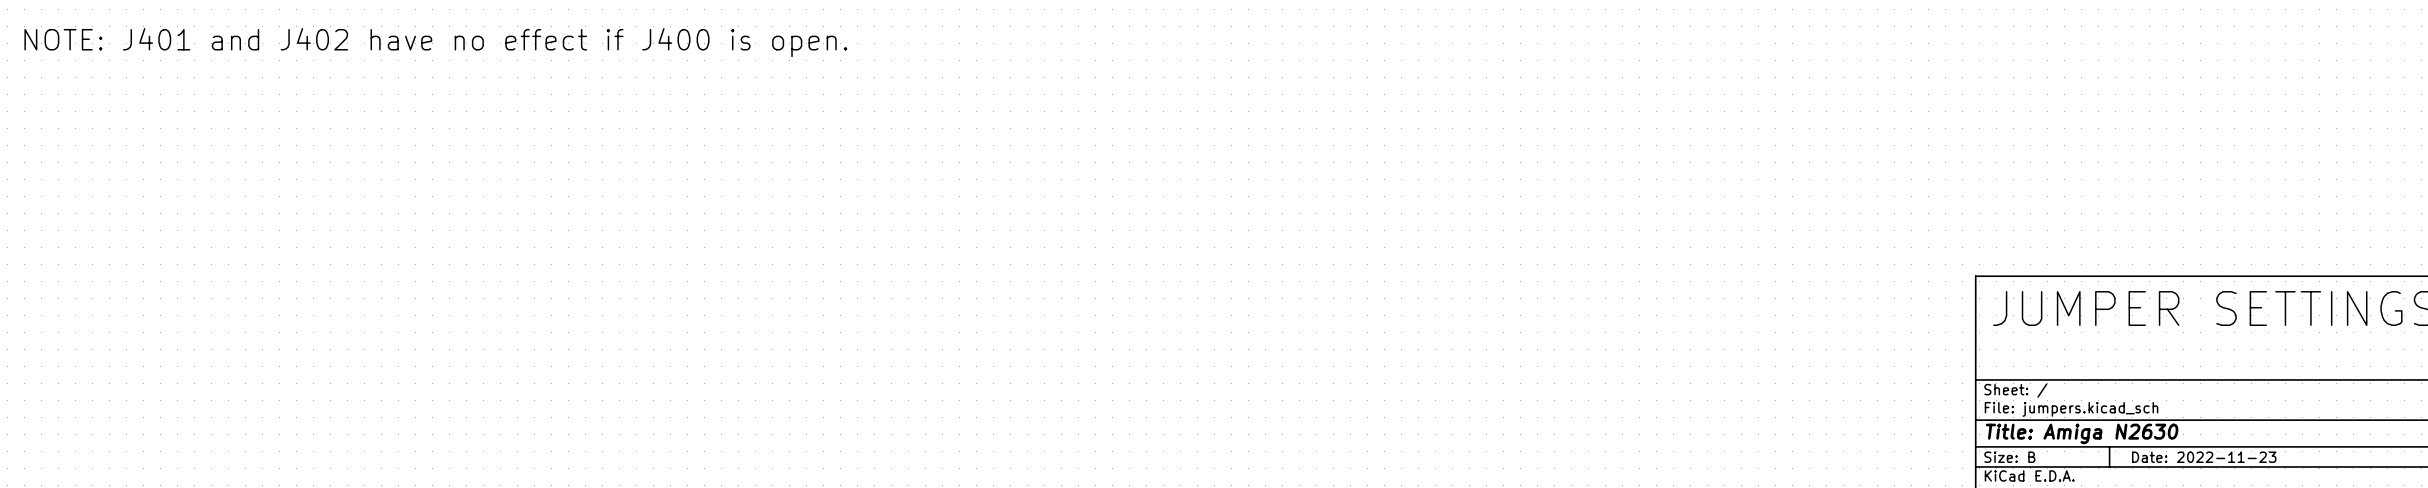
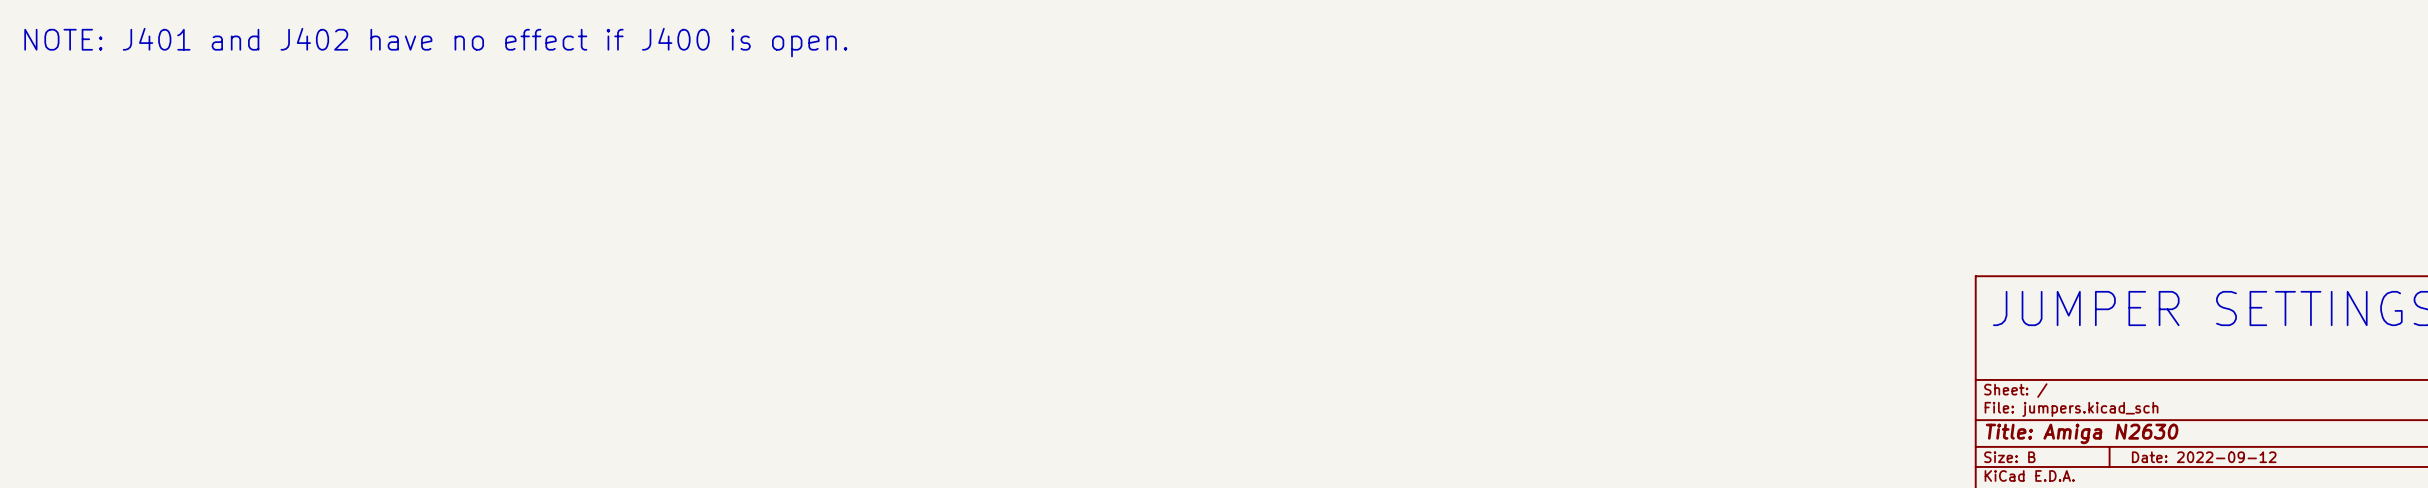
title block: Date: 2022-11-23 (2204, 457) -> Date: 2022-09-12 (2204, 457)

